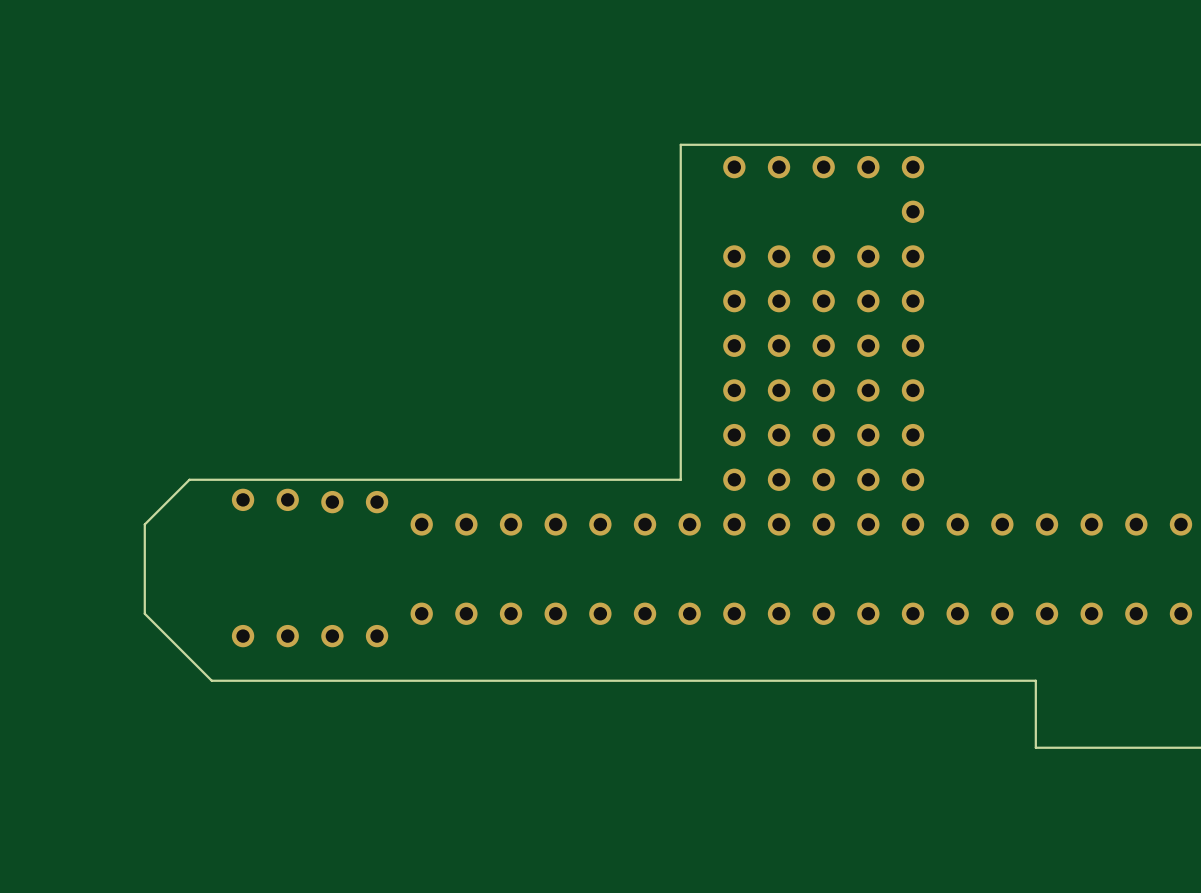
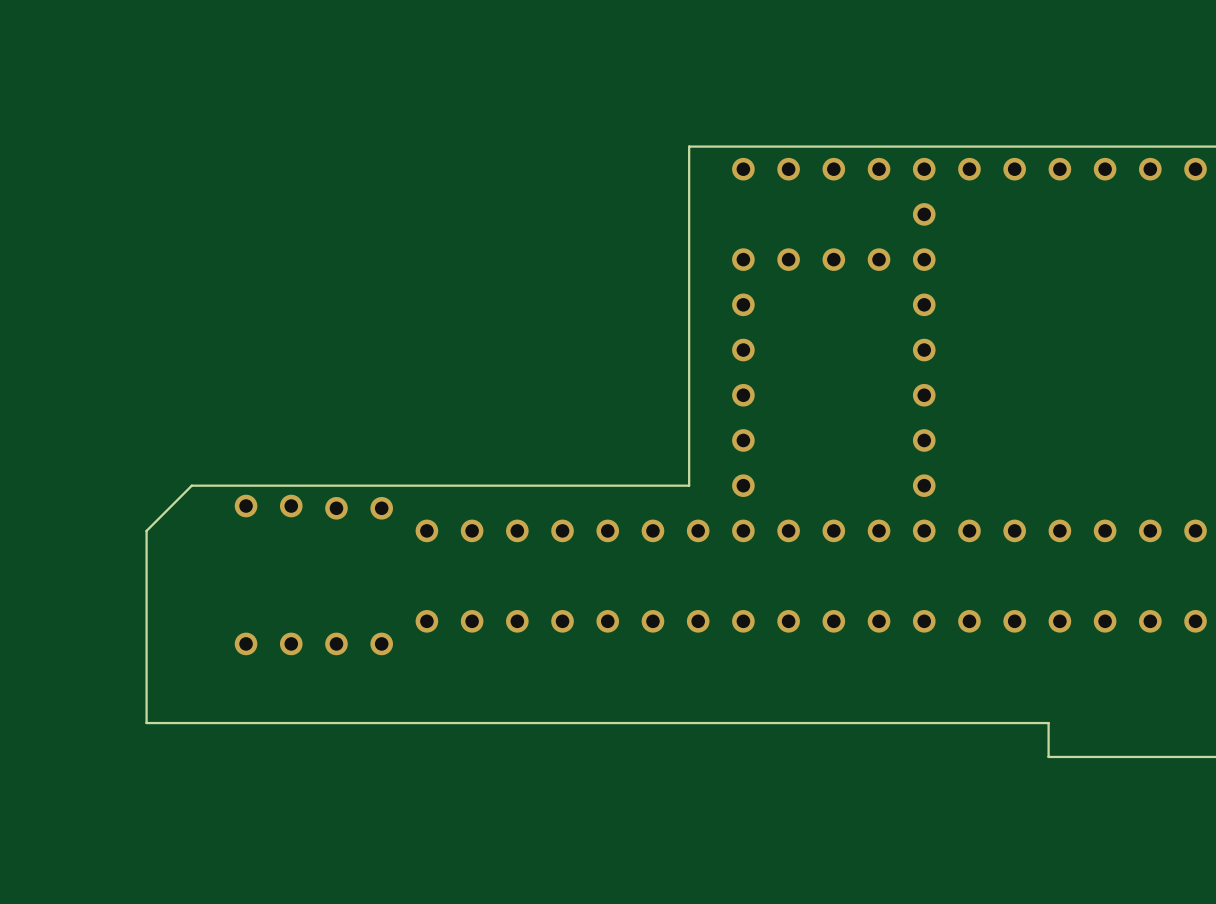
via: none -> (969, 169)
via: none -> (1014, 169)
via: none -> (1059, 169)
via: none -> (1105, 169)
via: none -> (1150, 169)
via: none -> (1195, 169)
via: (779, 301) -> none
via: (823, 301) -> none
via: (868, 301) -> none
via: (779, 345) -> none
via: (823, 345) -> none
via: (868, 345) -> none
via: (779, 390) -> none
via: (823, 390) -> none
via: (868, 390) -> none
via: (779, 435) -> none
via: (823, 435) -> none
via: (868, 435) -> none
via: (779, 479) -> none
via: (823, 479) -> none
via: (868, 479) -> none
board edge: (144, 613) (211, 680) (1035, 680) (1035, 714) -> (146, 621) (146, 723) (1048, 723)

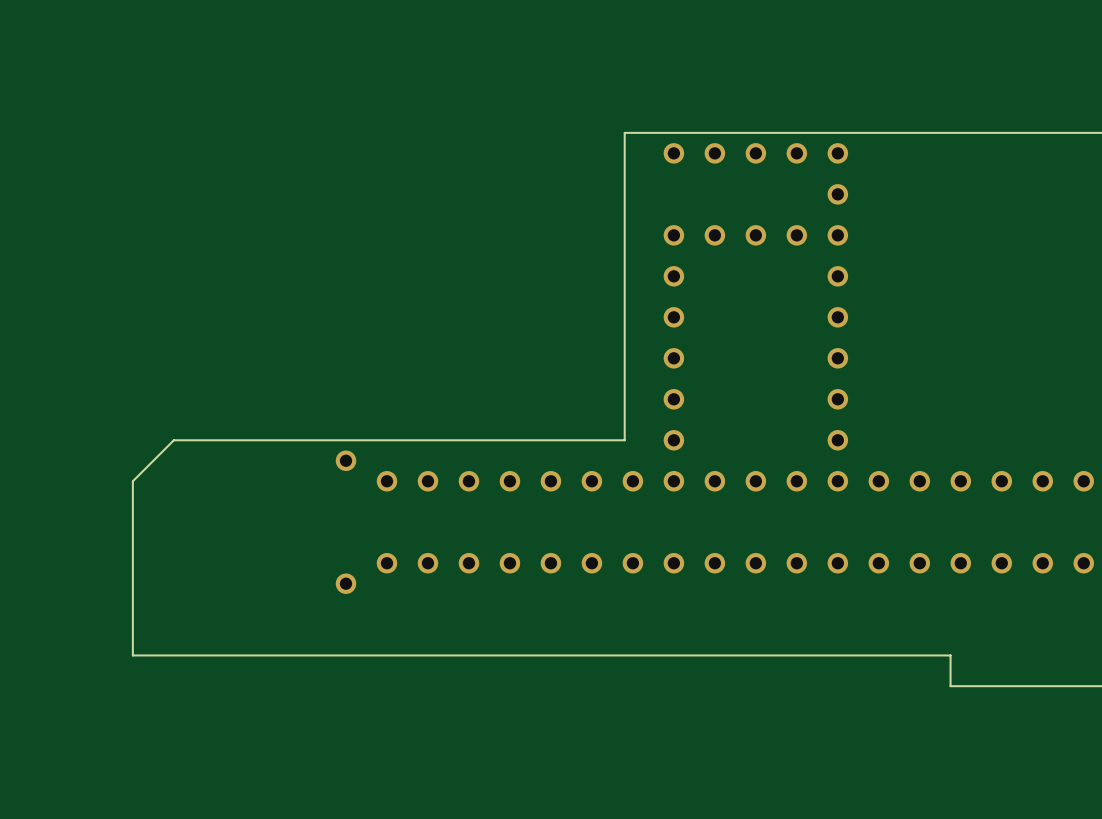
via: (969, 169) -> none
via: (1014, 169) -> none
via: (1059, 169) -> none
via: (1105, 169) -> none
via: (1150, 169) -> none
via: (1195, 169) -> none
via: (246, 506) -> none
via: (291, 506) -> none
via: (336, 508) -> none
via: (246, 643) -> none
via: (291, 643) -> none
via: (336, 643) -> none

